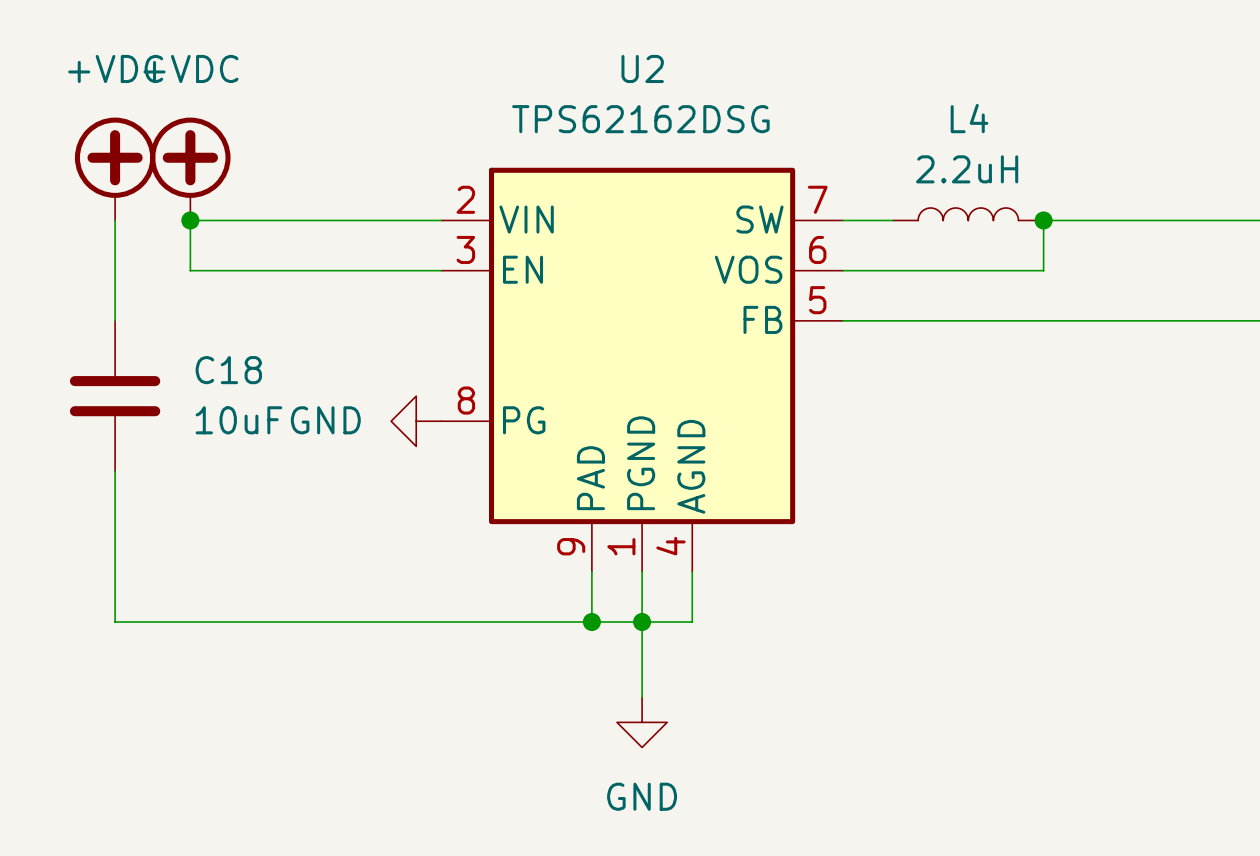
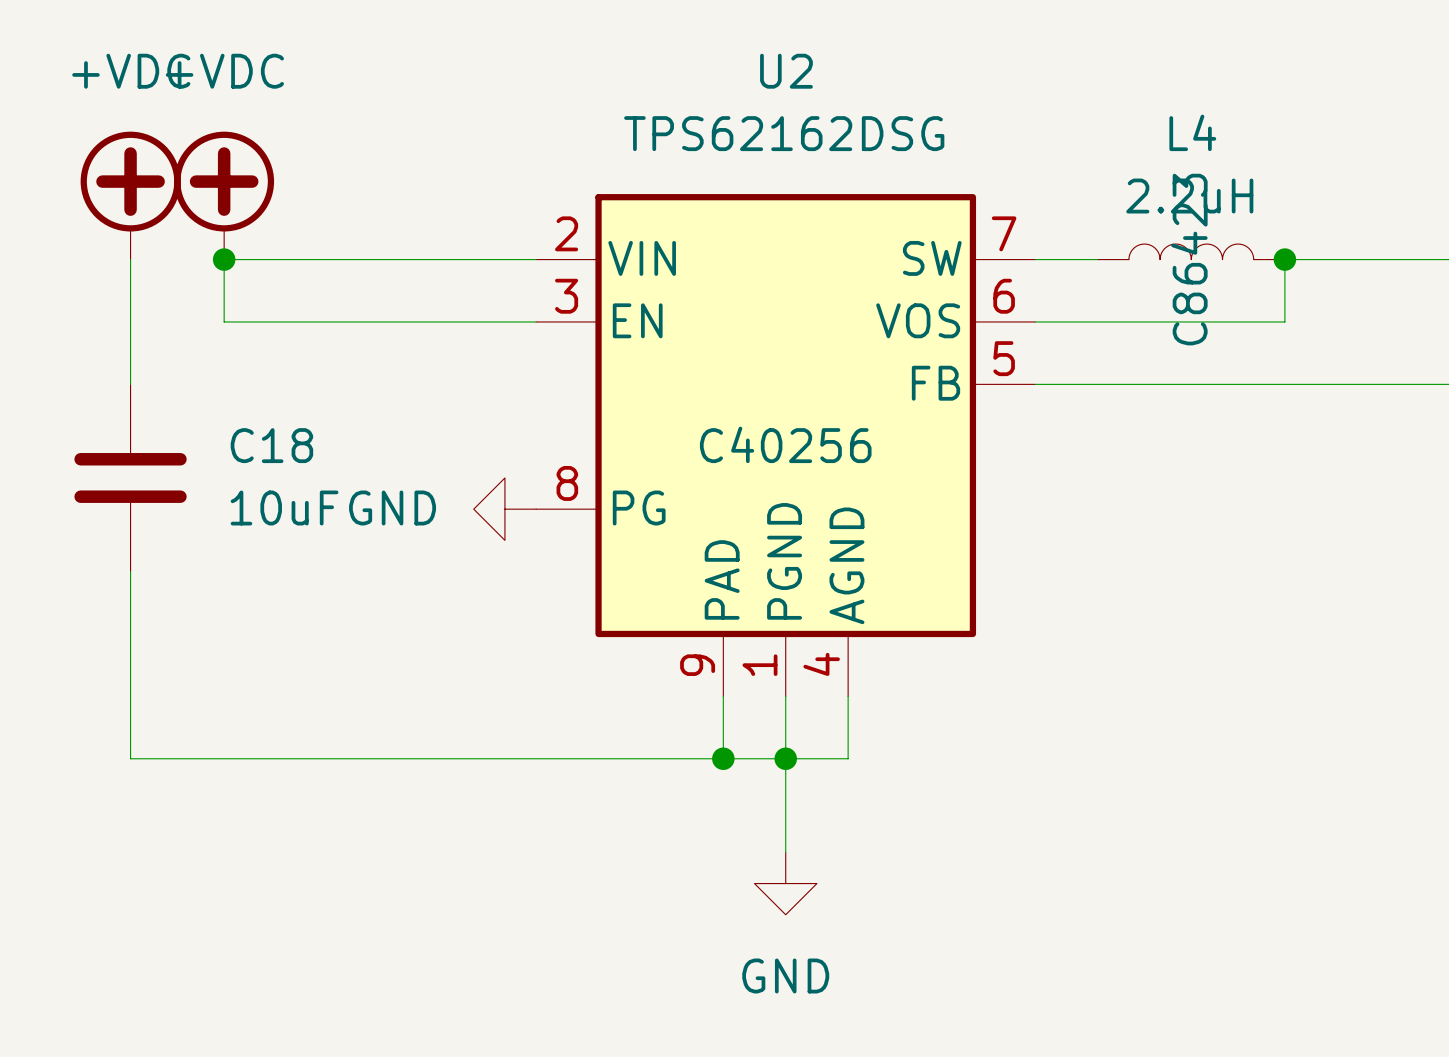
L4 text: none -> C86423 (1189, 259)
U2 text: none -> C40256 (785, 444)

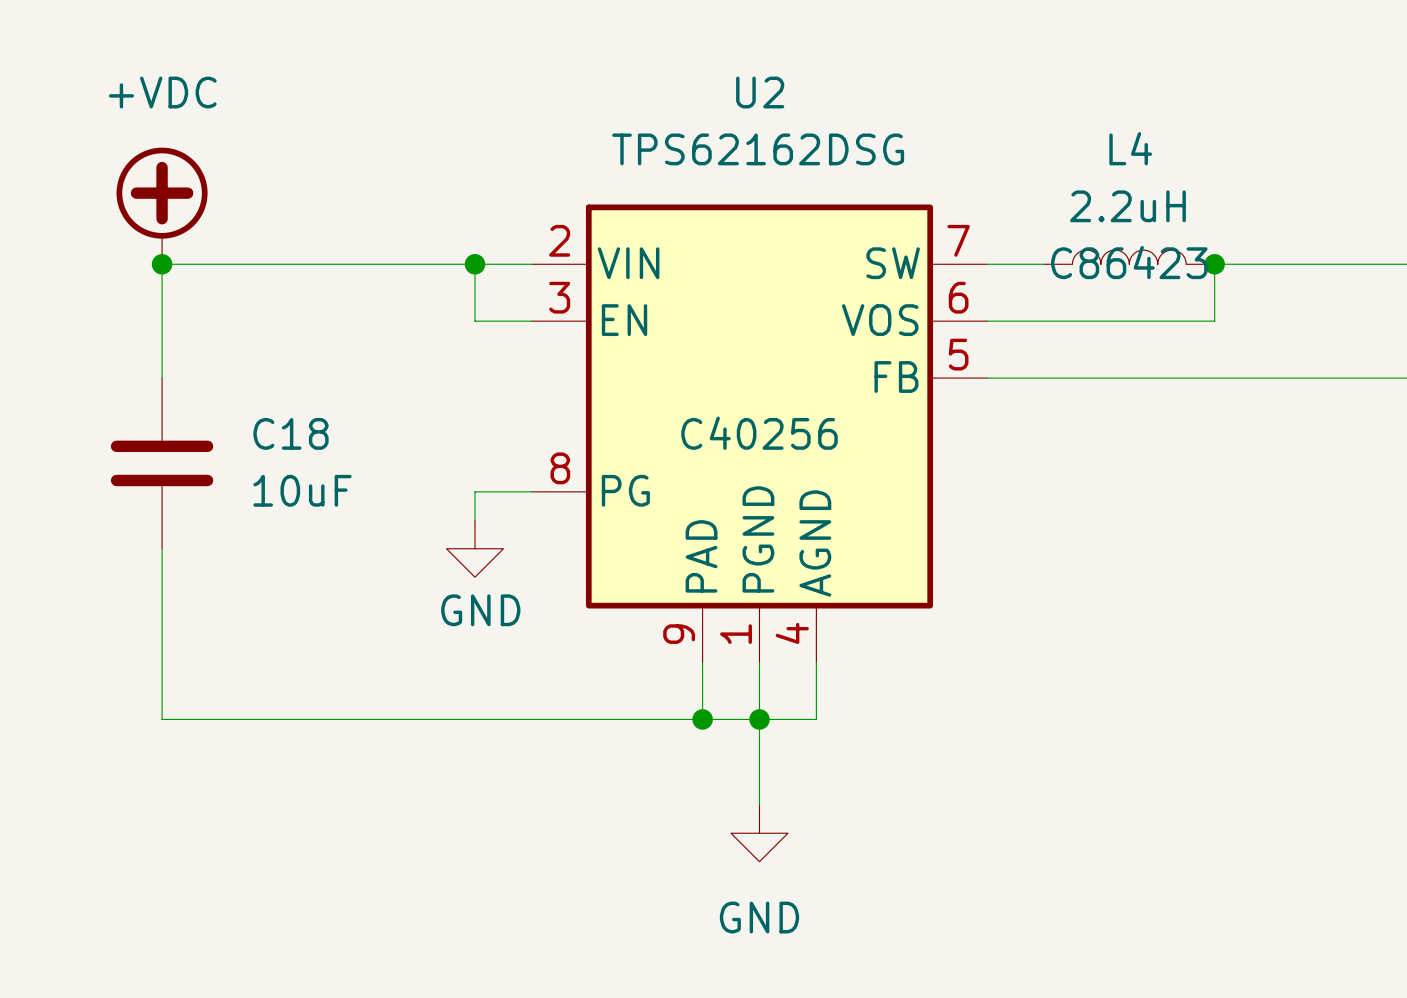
power symbol: +VDC (224, 195) -> none
wire: none -> (162, 264) (247, 264)
wire: (224, 259) (224, 321) (473, 321) -> (475, 264) (475, 321)
junction position: (224, 259) -> (162, 264)
junction: none -> (475, 264)
L4 text rotation: 0° (1189, 259) -> 90° clockwise (1129, 262)
power symbol text position: GND (392, 508) -> GND (480, 610)
power symbol rotation: 0° (504, 509) -> 90° counterclockwise (475, 548)
power symbol position: GND (504, 509) -> GND (475, 548)
wire: none -> (531, 491) (475, 491) (475, 520)

